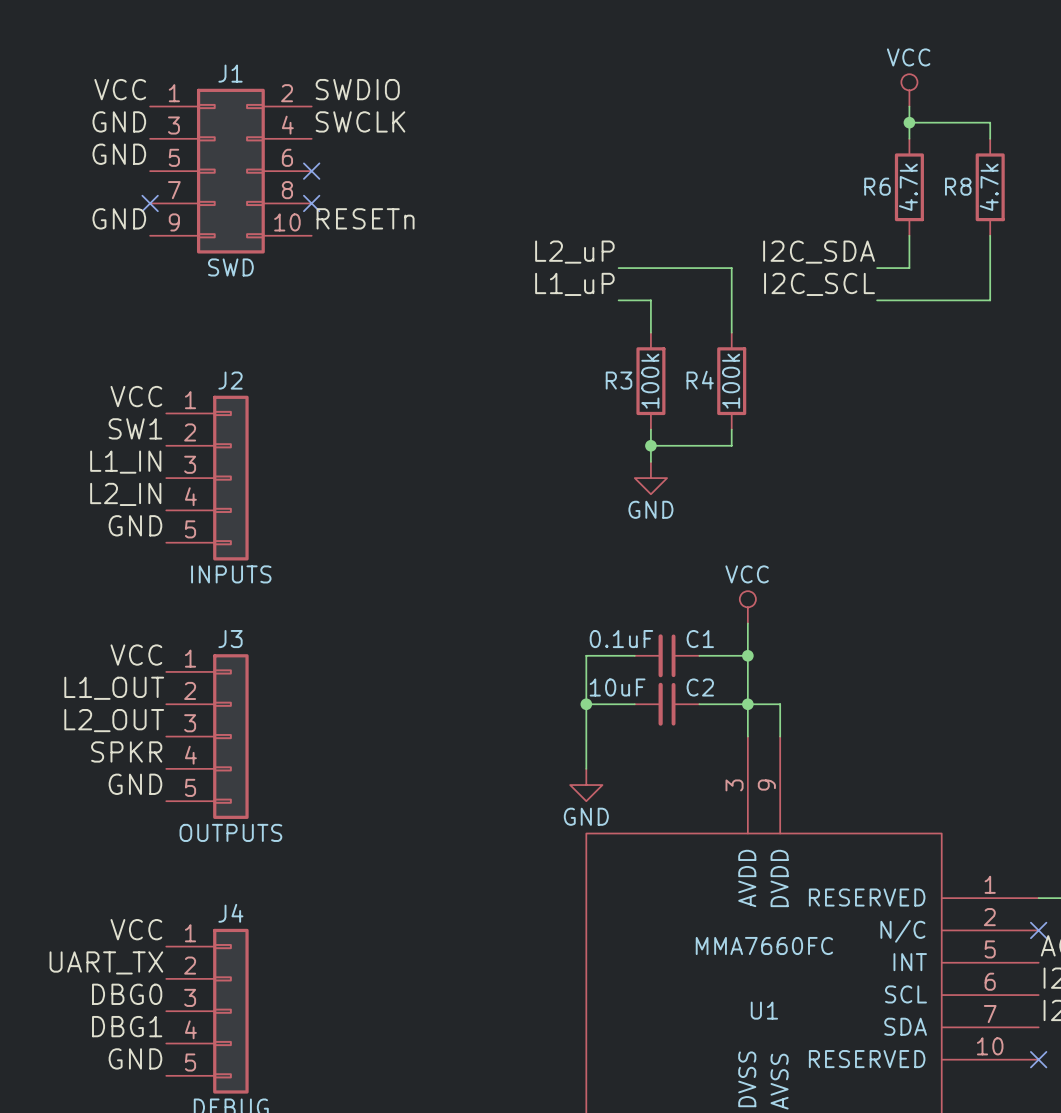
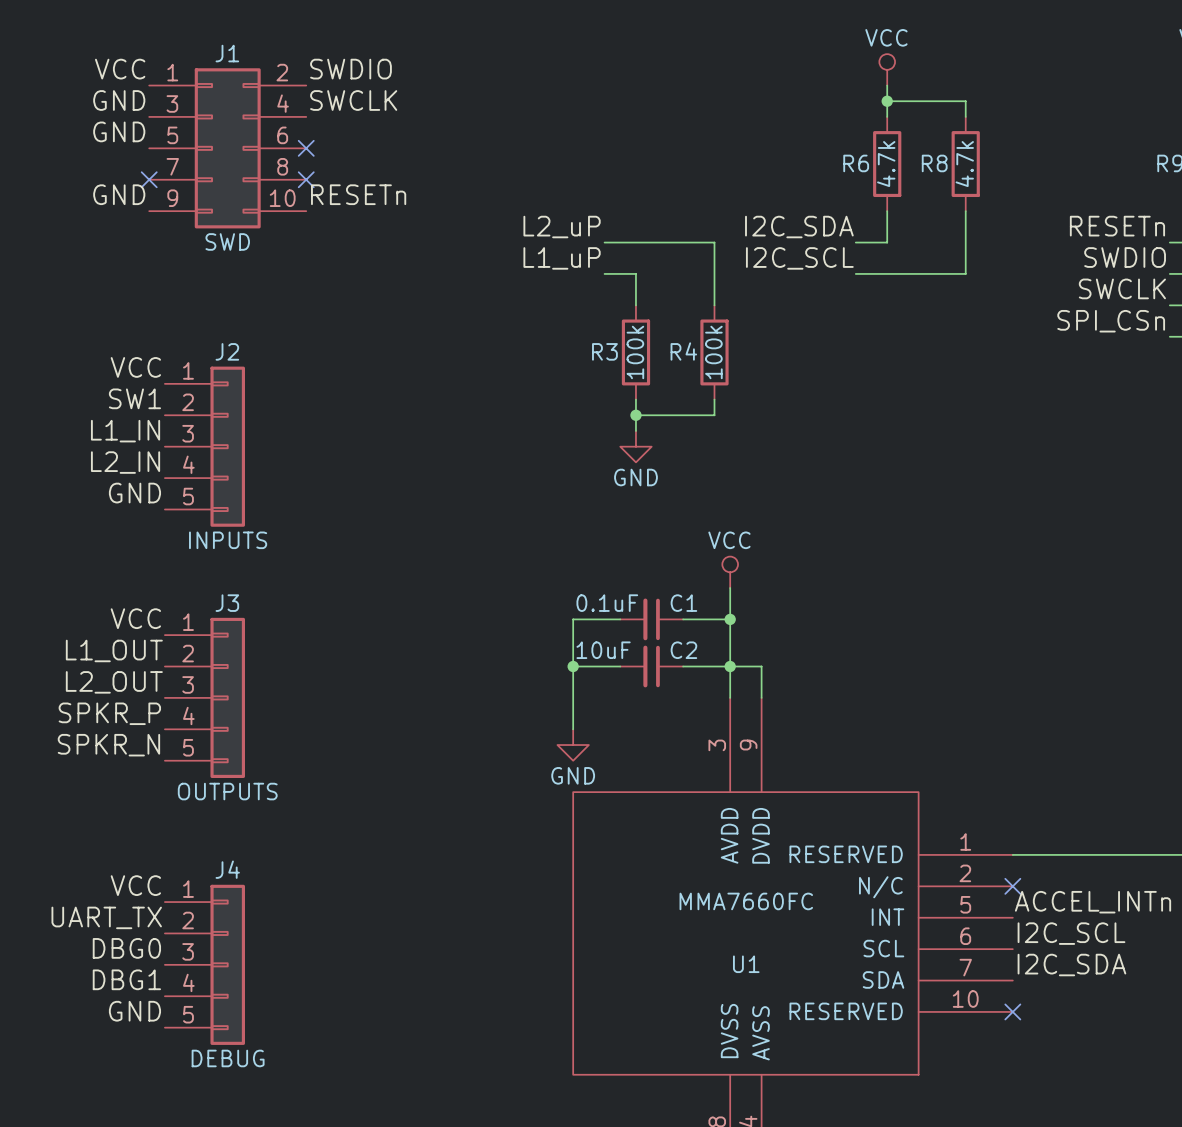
label: SPKR (126, 751) -> SPKR_P (109, 713)
label: GND (135, 784) -> SPKR_N (108, 745)

